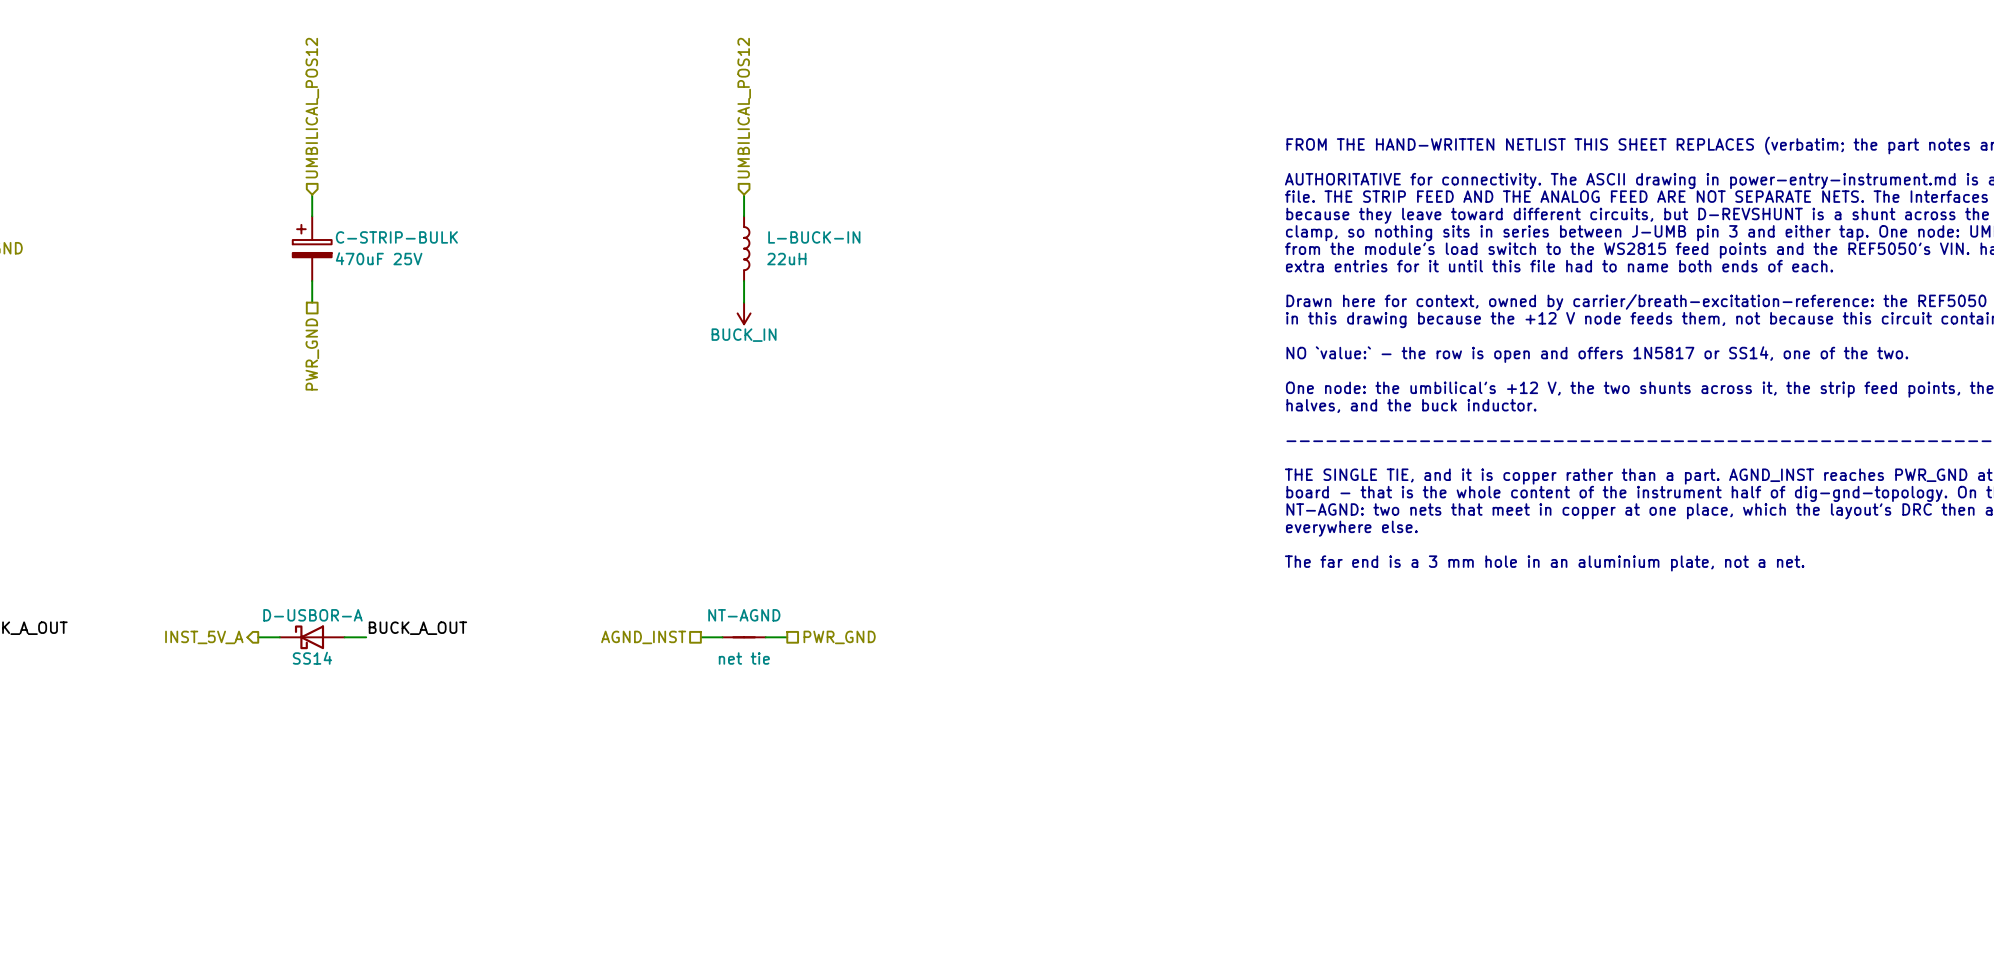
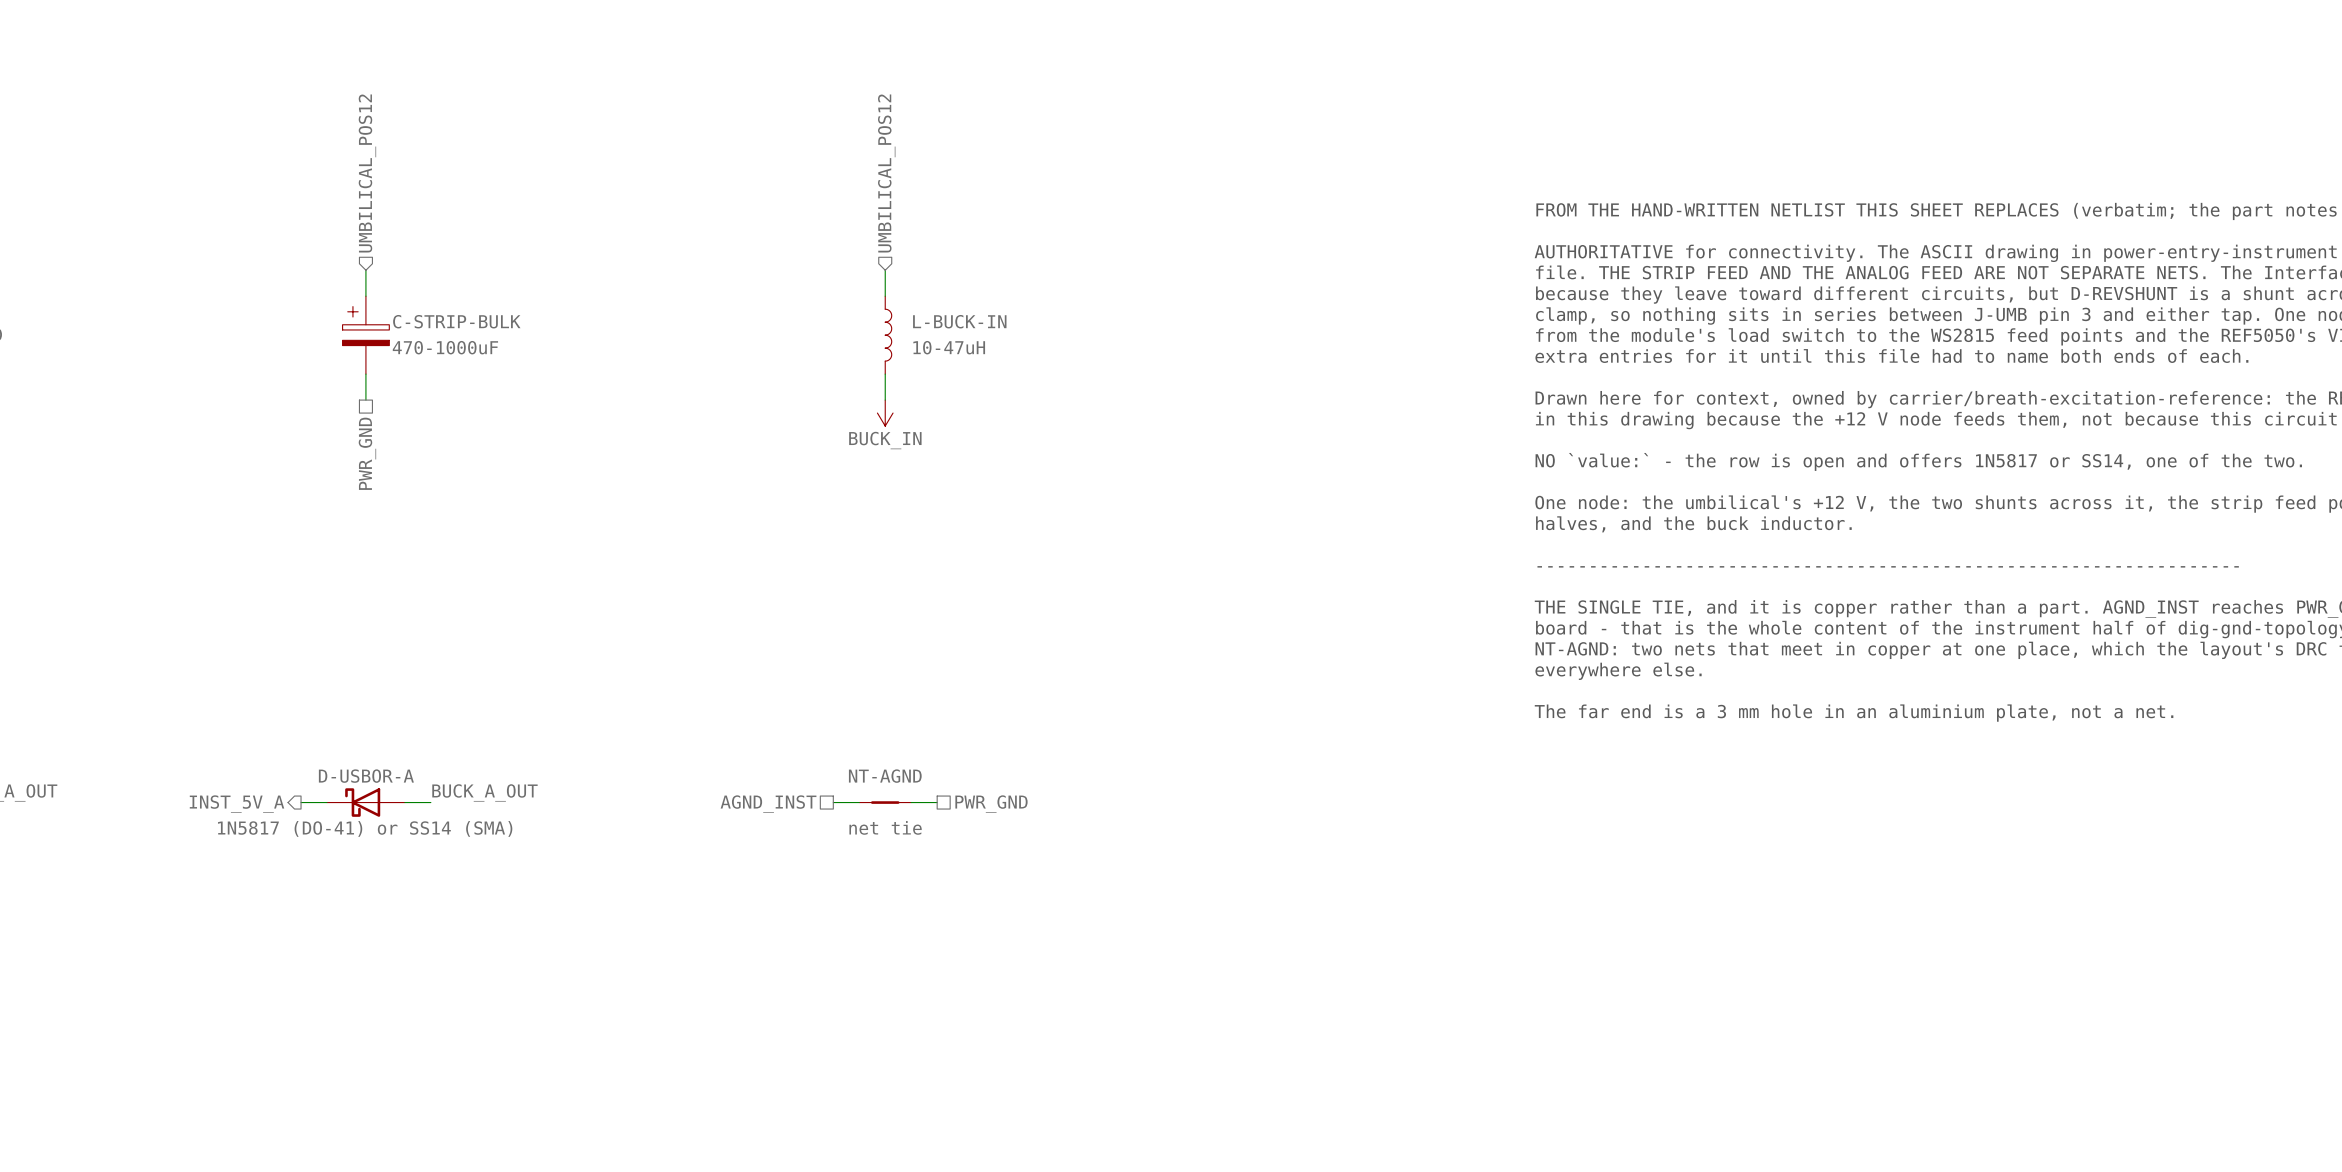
C-STRIP-BULK value: 470uF 25V (379, 258) -> 470-1000uF (445, 347)
L-BUCK-IN value: 22uH (786, 259) -> 10-47uH (949, 347)
D-USBOR-A value: SS14 (312, 658) -> 1N5817 (DO-41) or SS14 (SMA) (365, 828)

